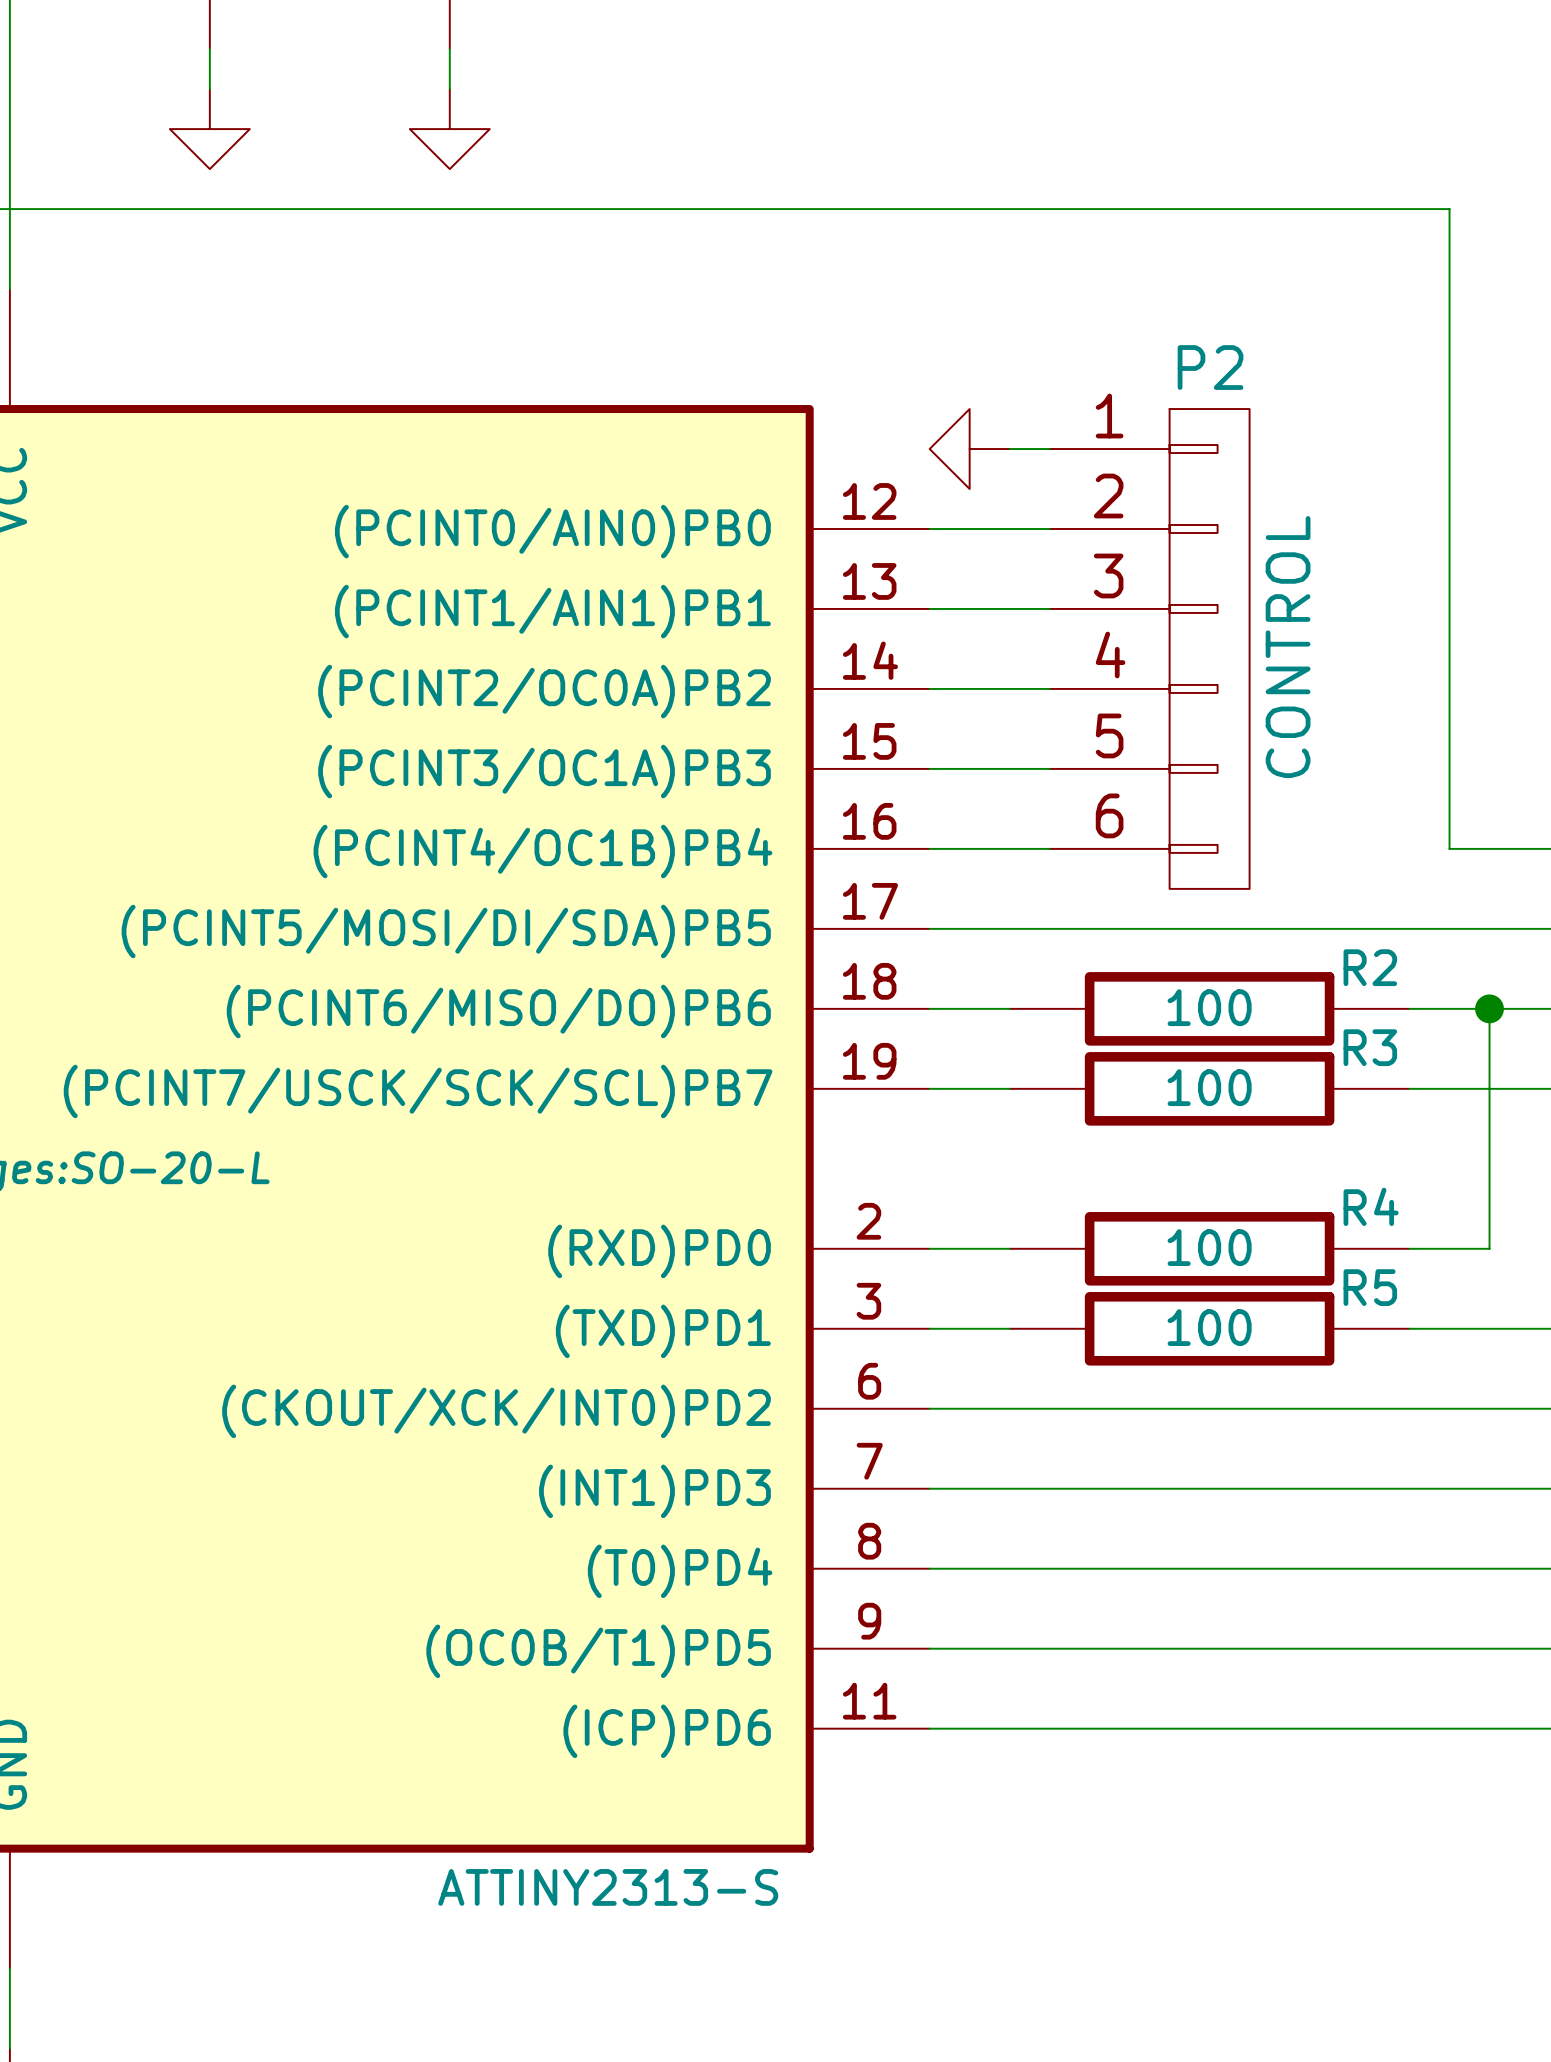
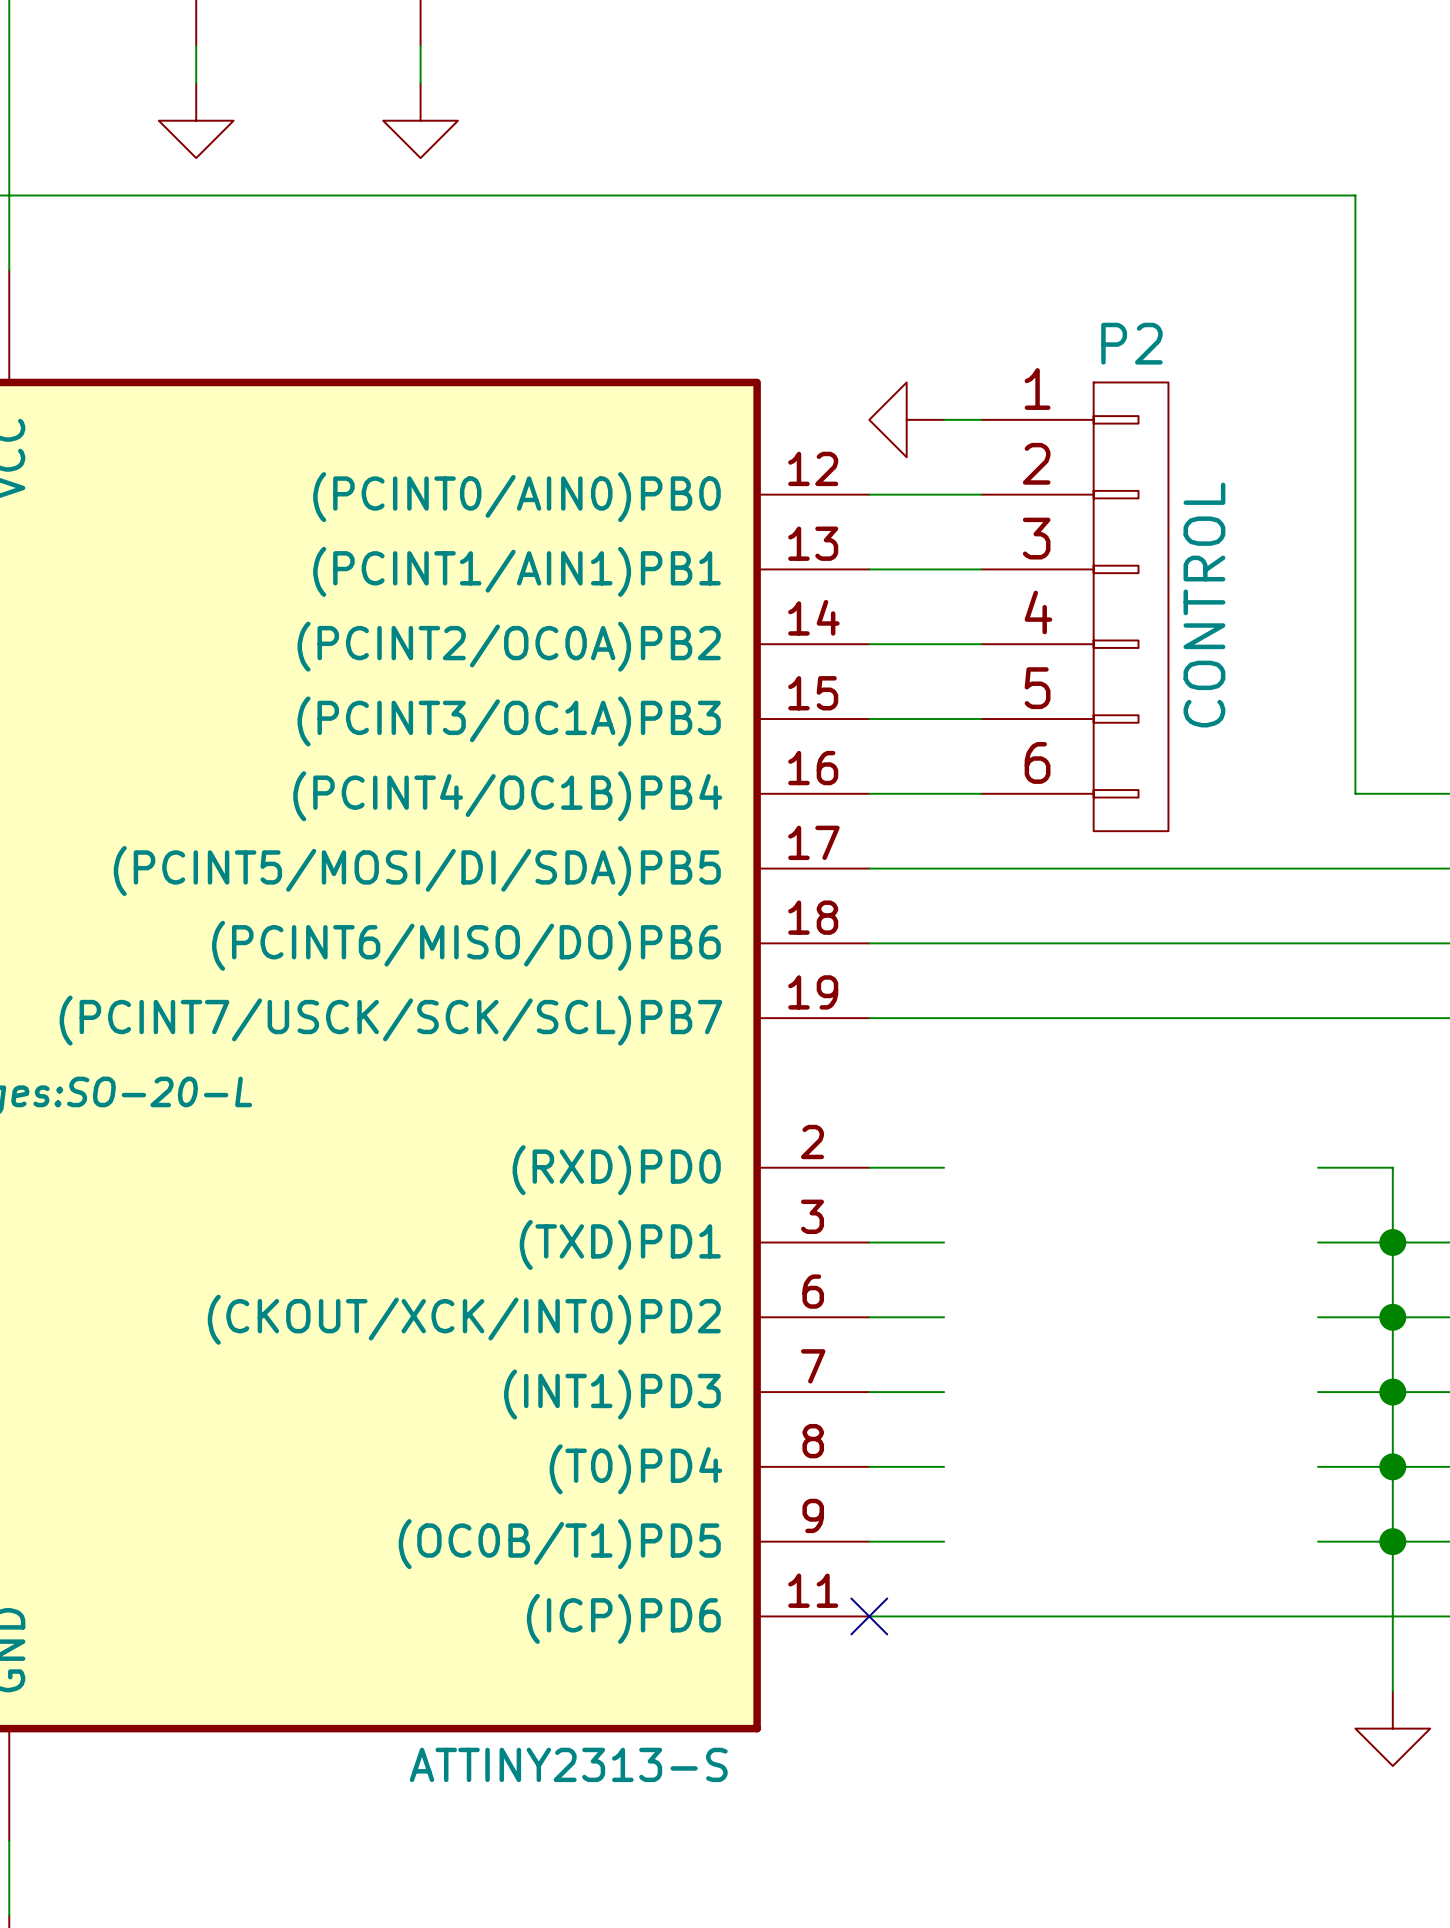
R2: 100 (1209, 1008) -> none
wire: (1489, 1008) (1489, 1248) -> (1392, 1691) (1392, 1167)
junction: (1489, 1008) -> none
R3: 100 (1209, 1088) -> none
R4: 100 (1209, 1248) -> none
R5: 100 (1209, 1328) -> none
junction: none -> (1392, 1242)
wire: (1009, 1408) (1409, 1408) -> (944, 943) (1318, 943)
junction: none -> (1392, 1317)
wire: (1009, 1488) (1409, 1488) -> (944, 1018) (1318, 1018)
junction: none -> (1392, 1392)
wire: (1009, 1568) (1409, 1568) -> none
junction: none -> (1392, 1466)
wire: (1009, 1648) (1409, 1648) -> none
junction: none -> (1392, 1541)
no-connect mark: none -> (869, 1616)
power symbol: none -> (1392, 1728)

